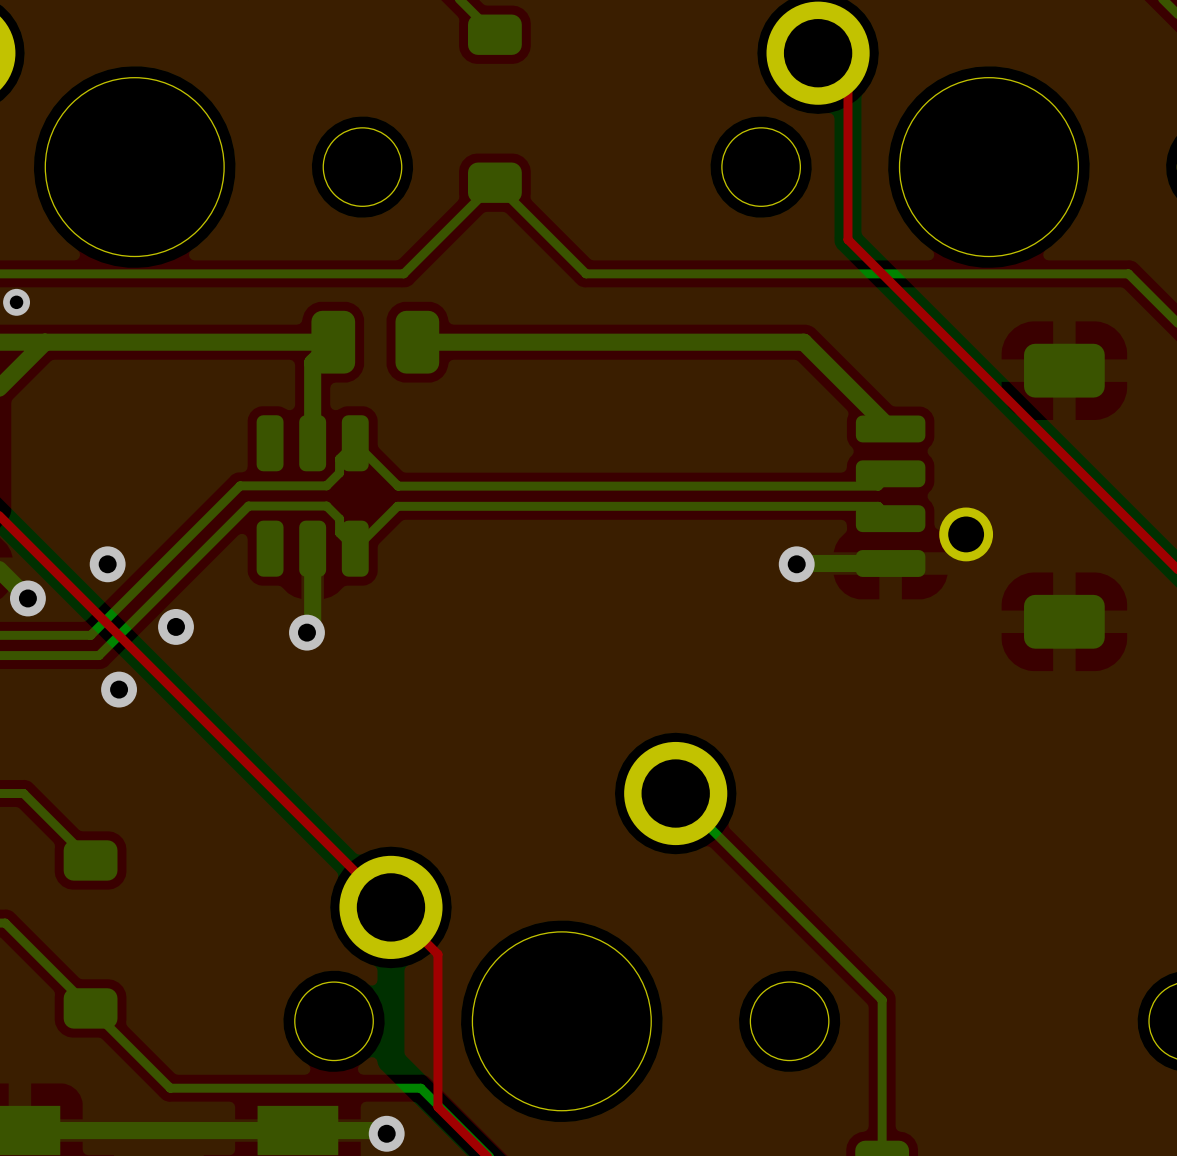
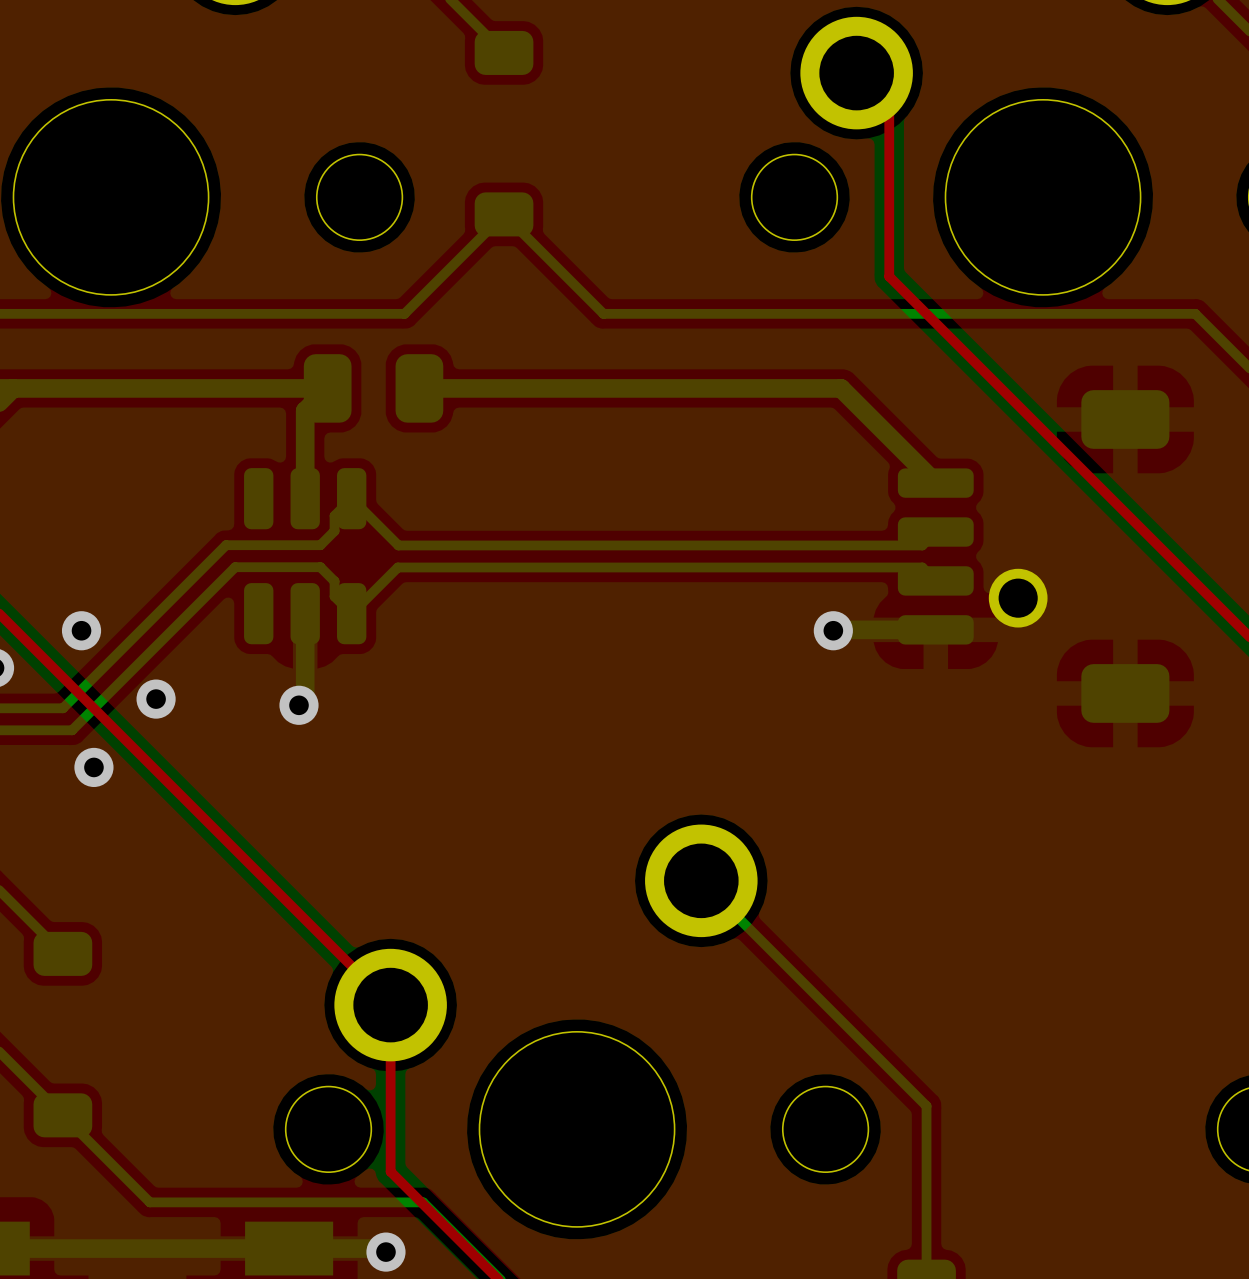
top track: (390, 907) (437, 954) (437, 1107) -> (390, 1005) (390, 1171) (441, 1222)

